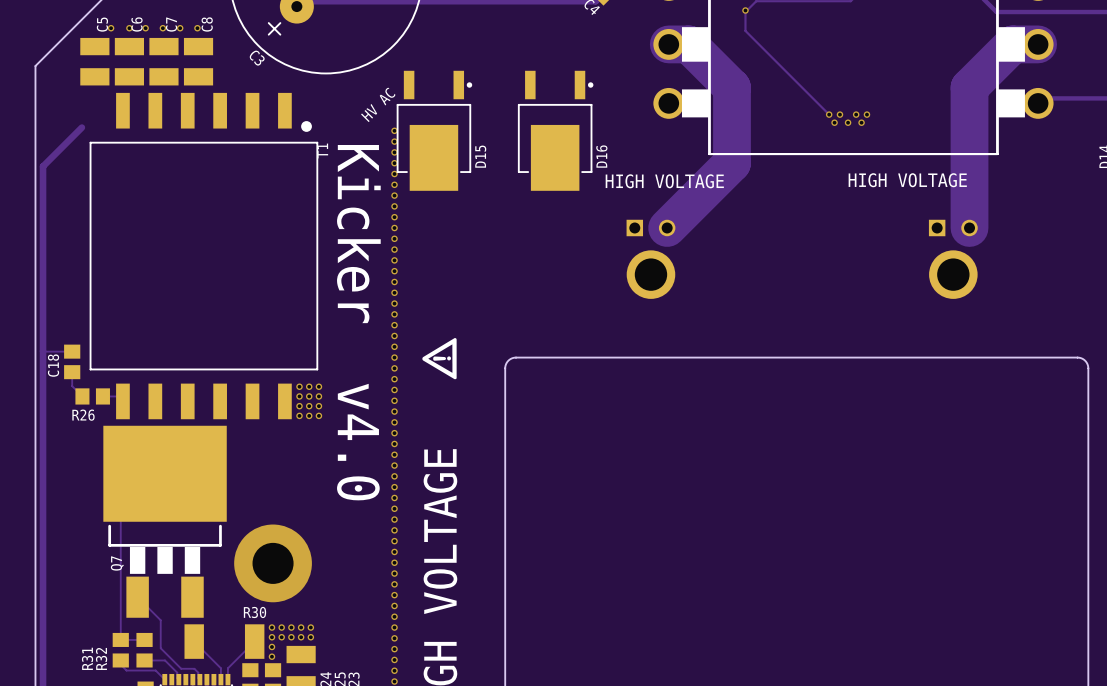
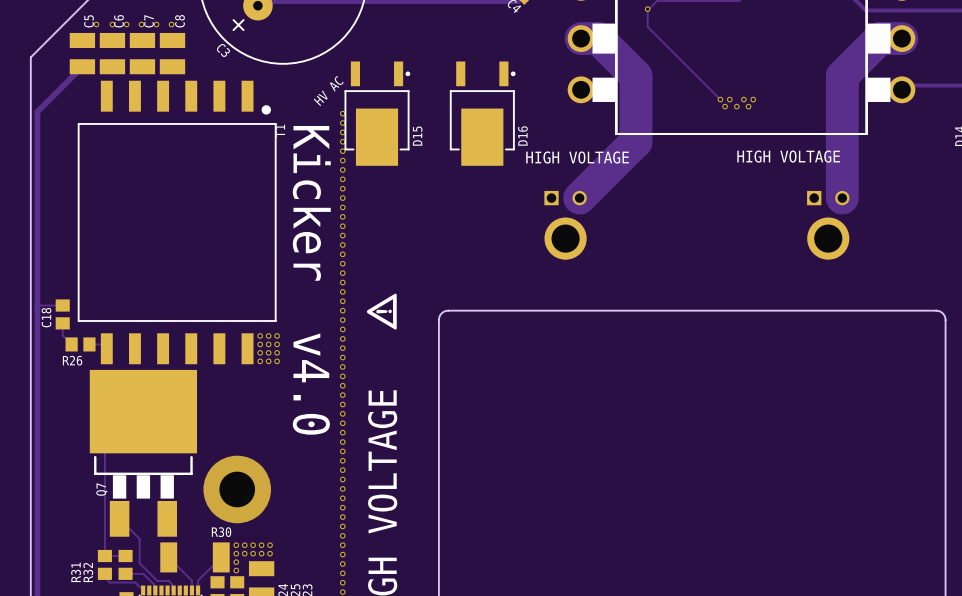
track: (81, 127) (43, 166) -> (82, 66) (37, 111) (37, 144)

